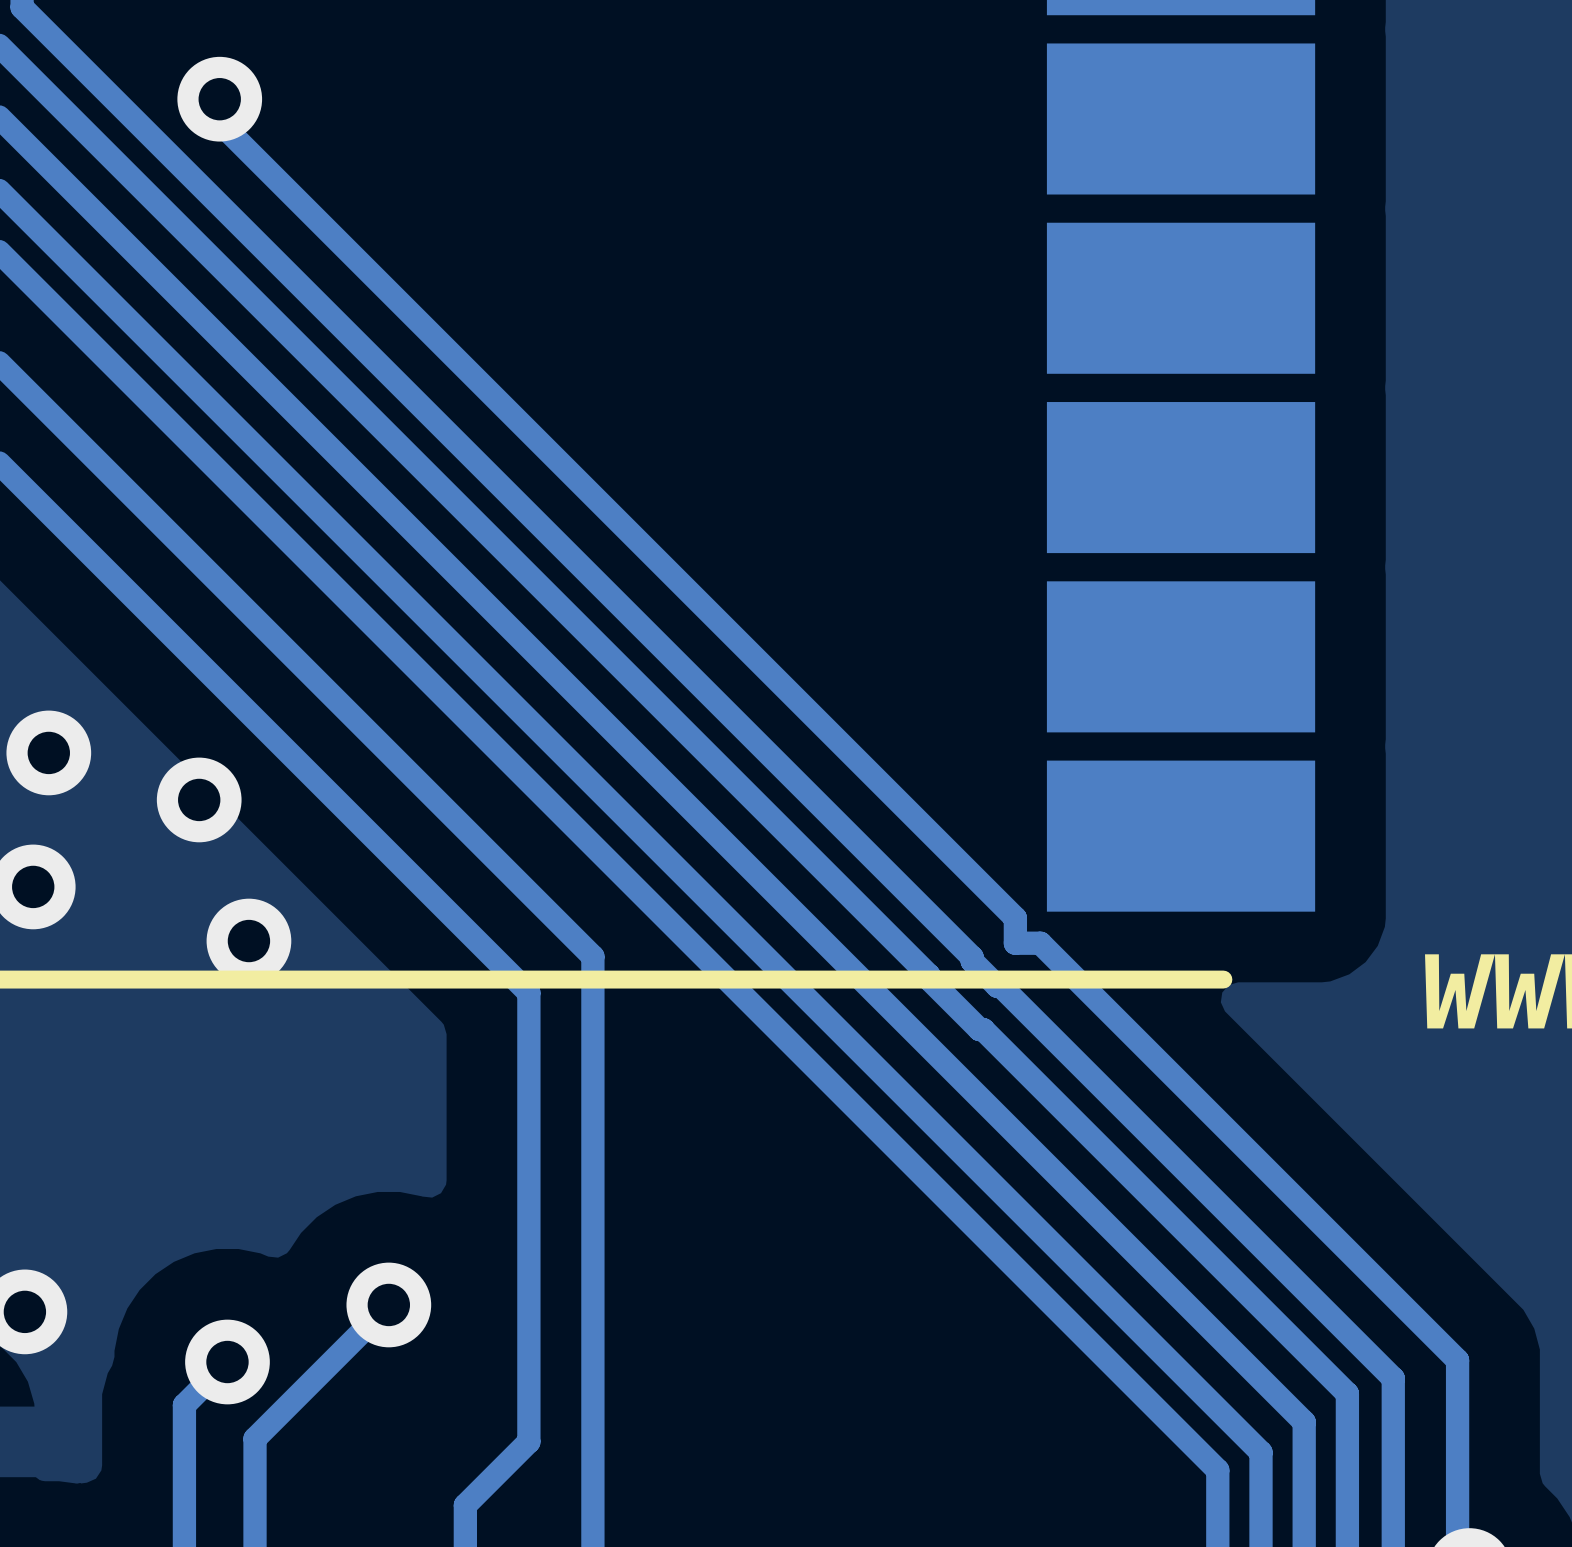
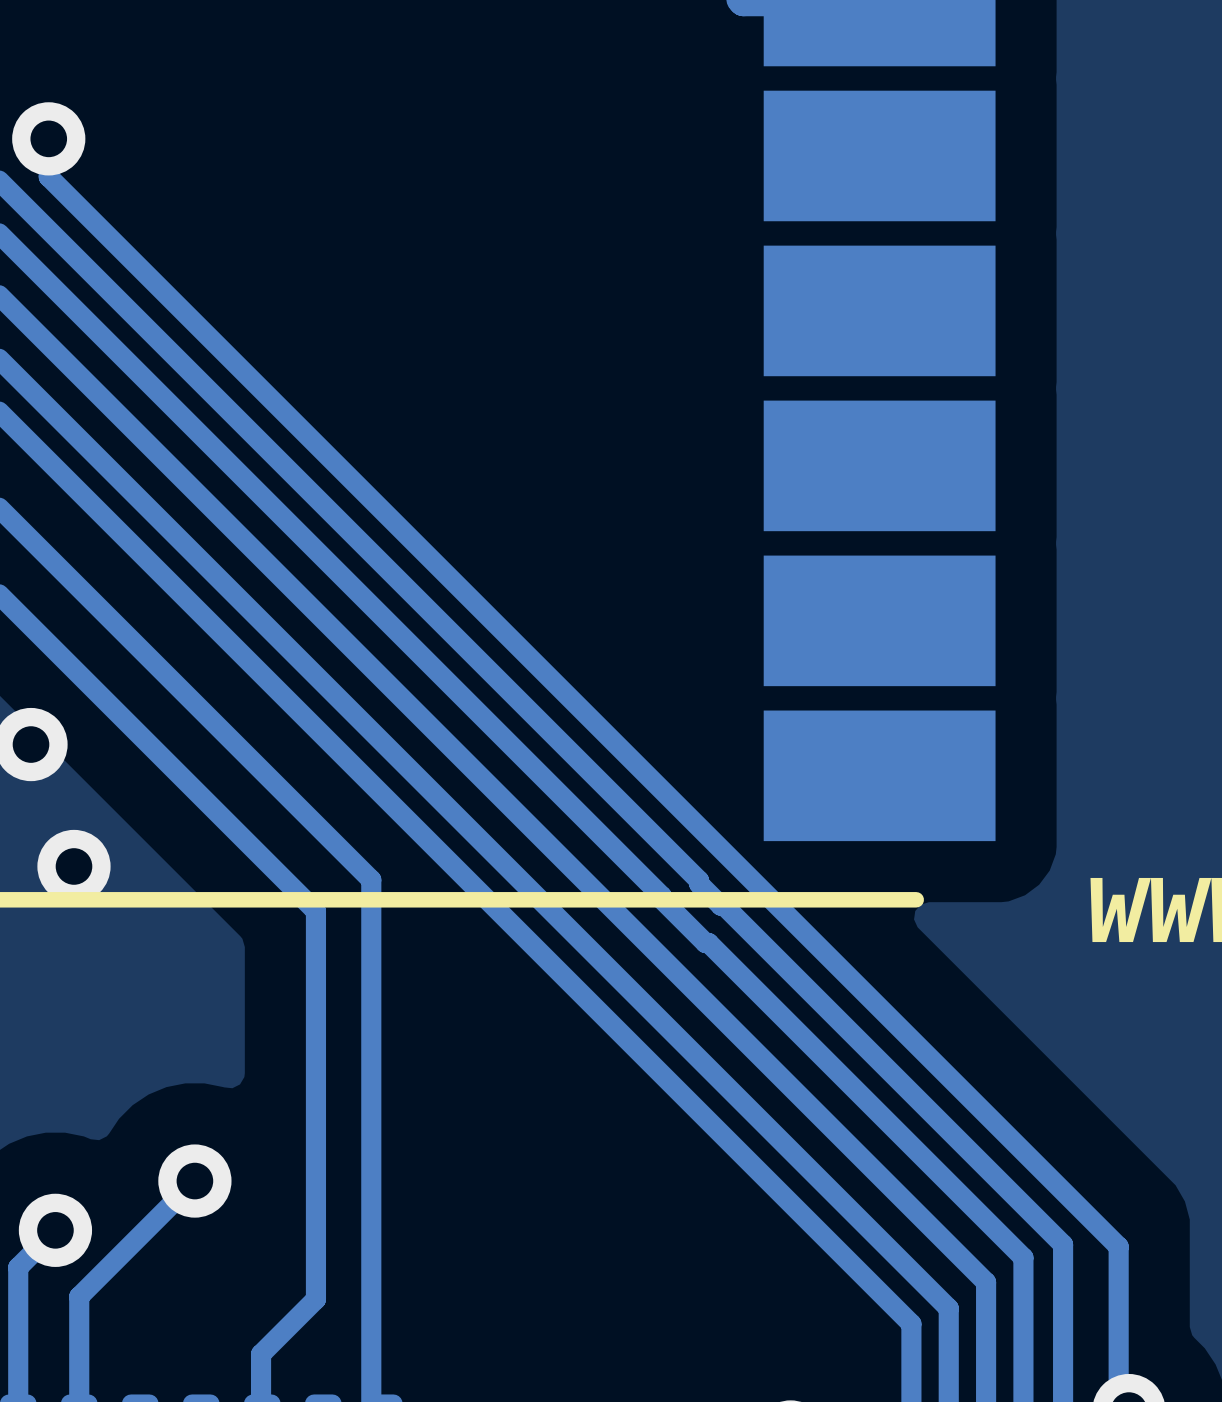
track: (219, 122) (1015, 918) (1015, 943) (1040, 943) (1457, 1360) (1457, 1380) -> (48, 159) (48, 176) (1118, 1246)

